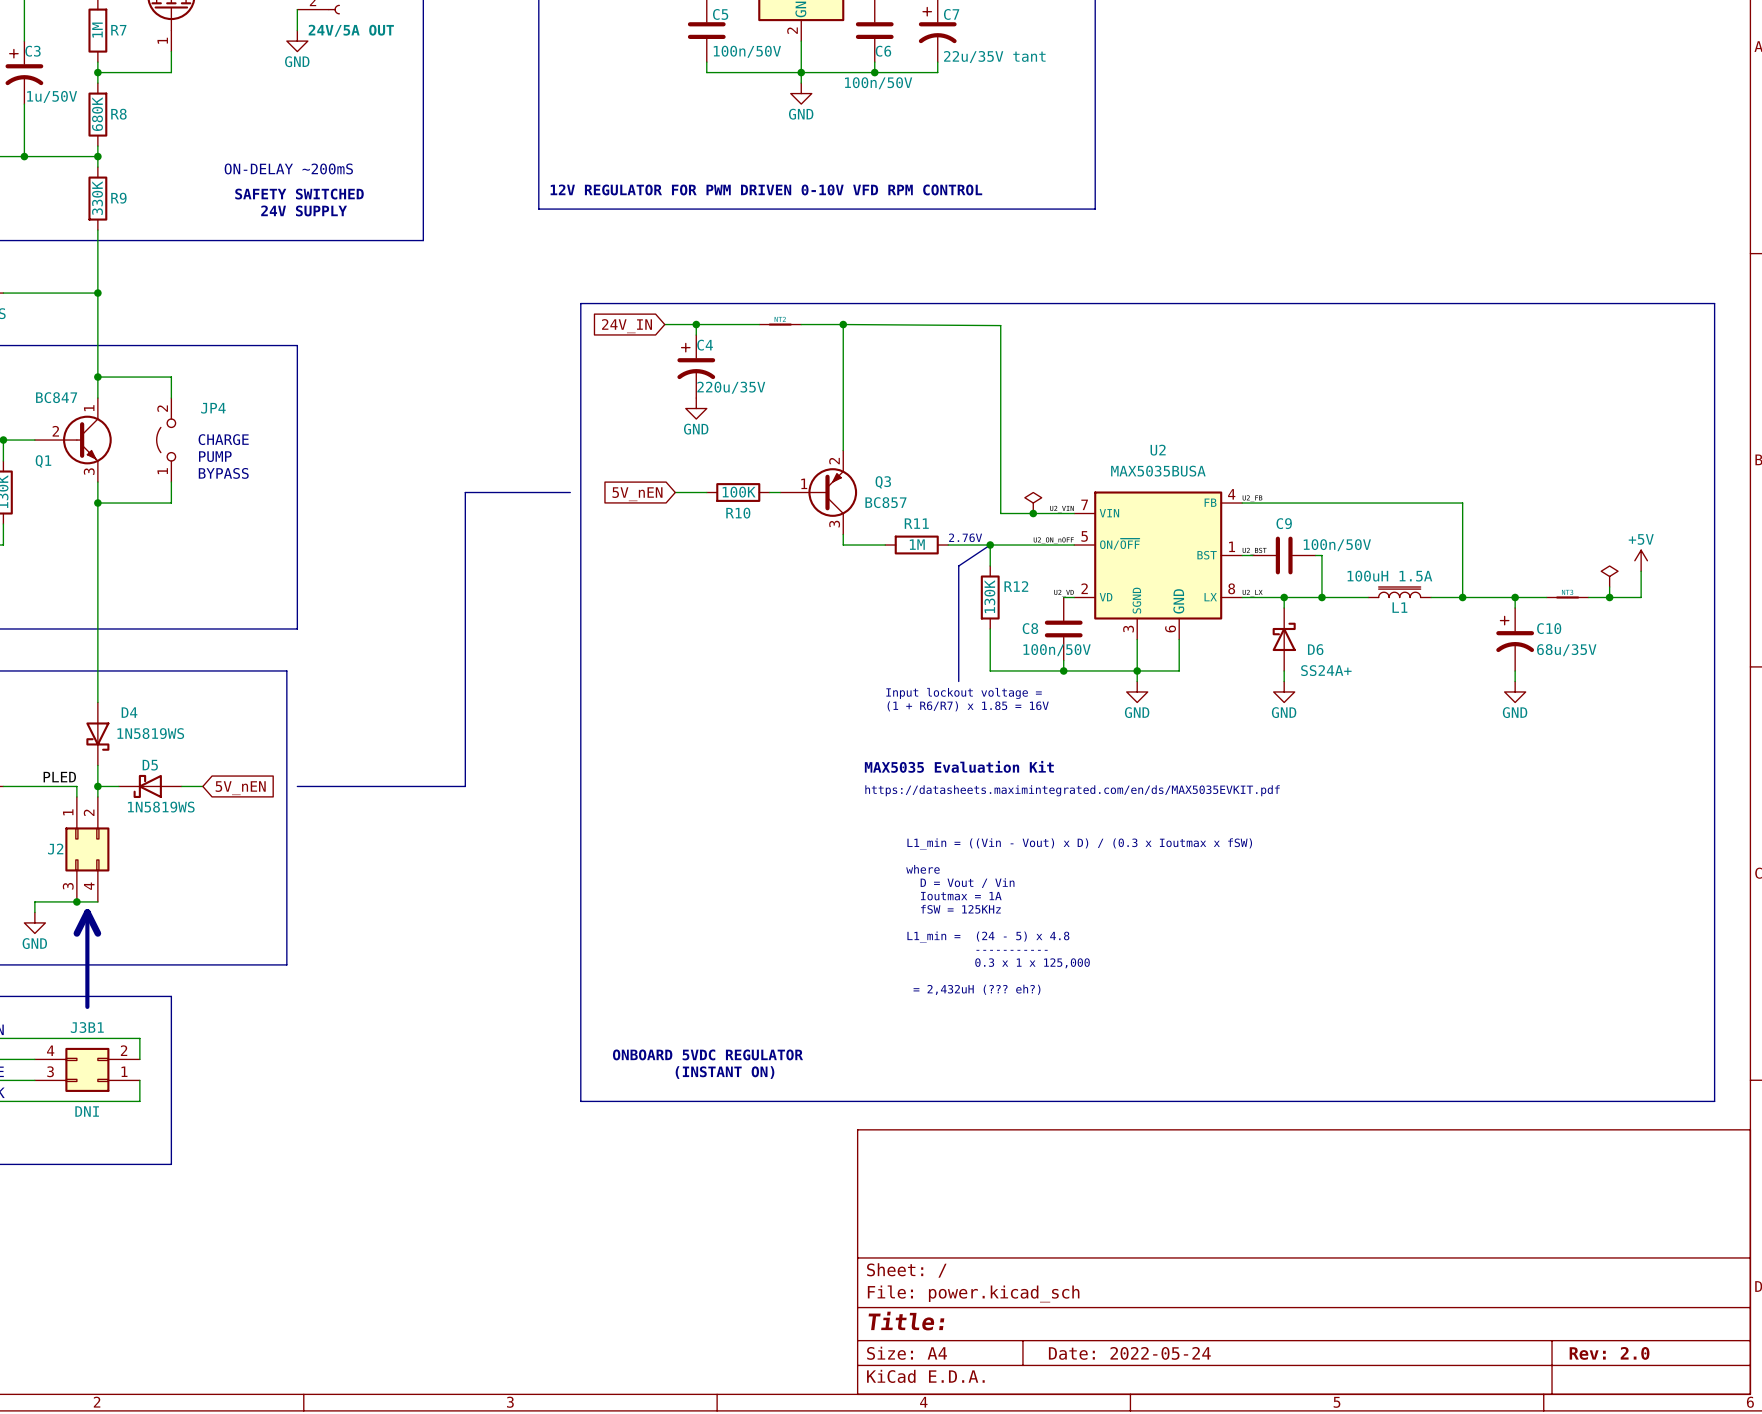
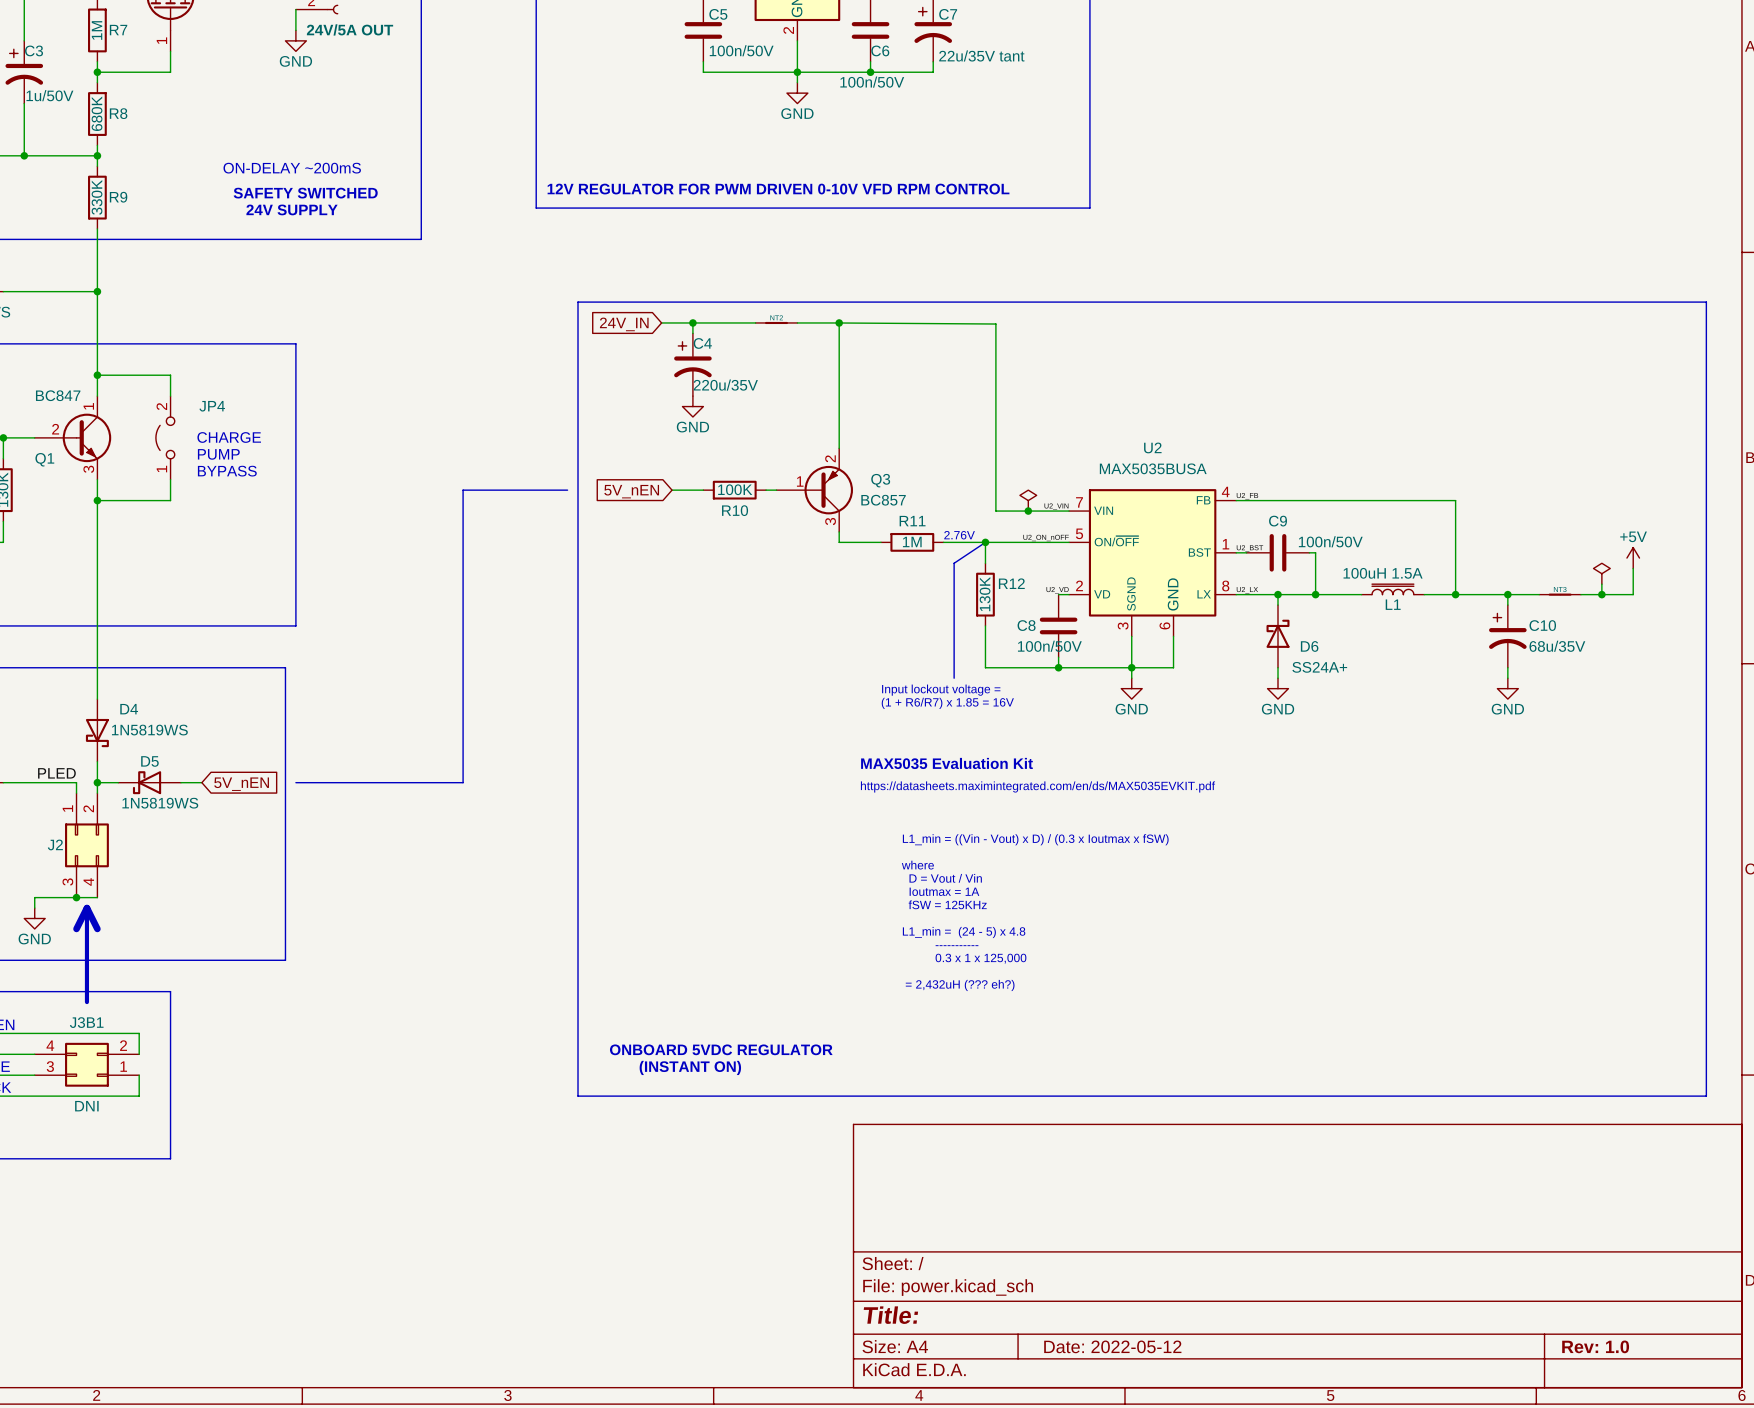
title block: Date: 2022-05-24 (1129, 1353) -> Date: 2022-05-12 (1112, 1346)
title block: Rev: 2.0 (1609, 1353) -> Rev: 1.0 (1595, 1346)

